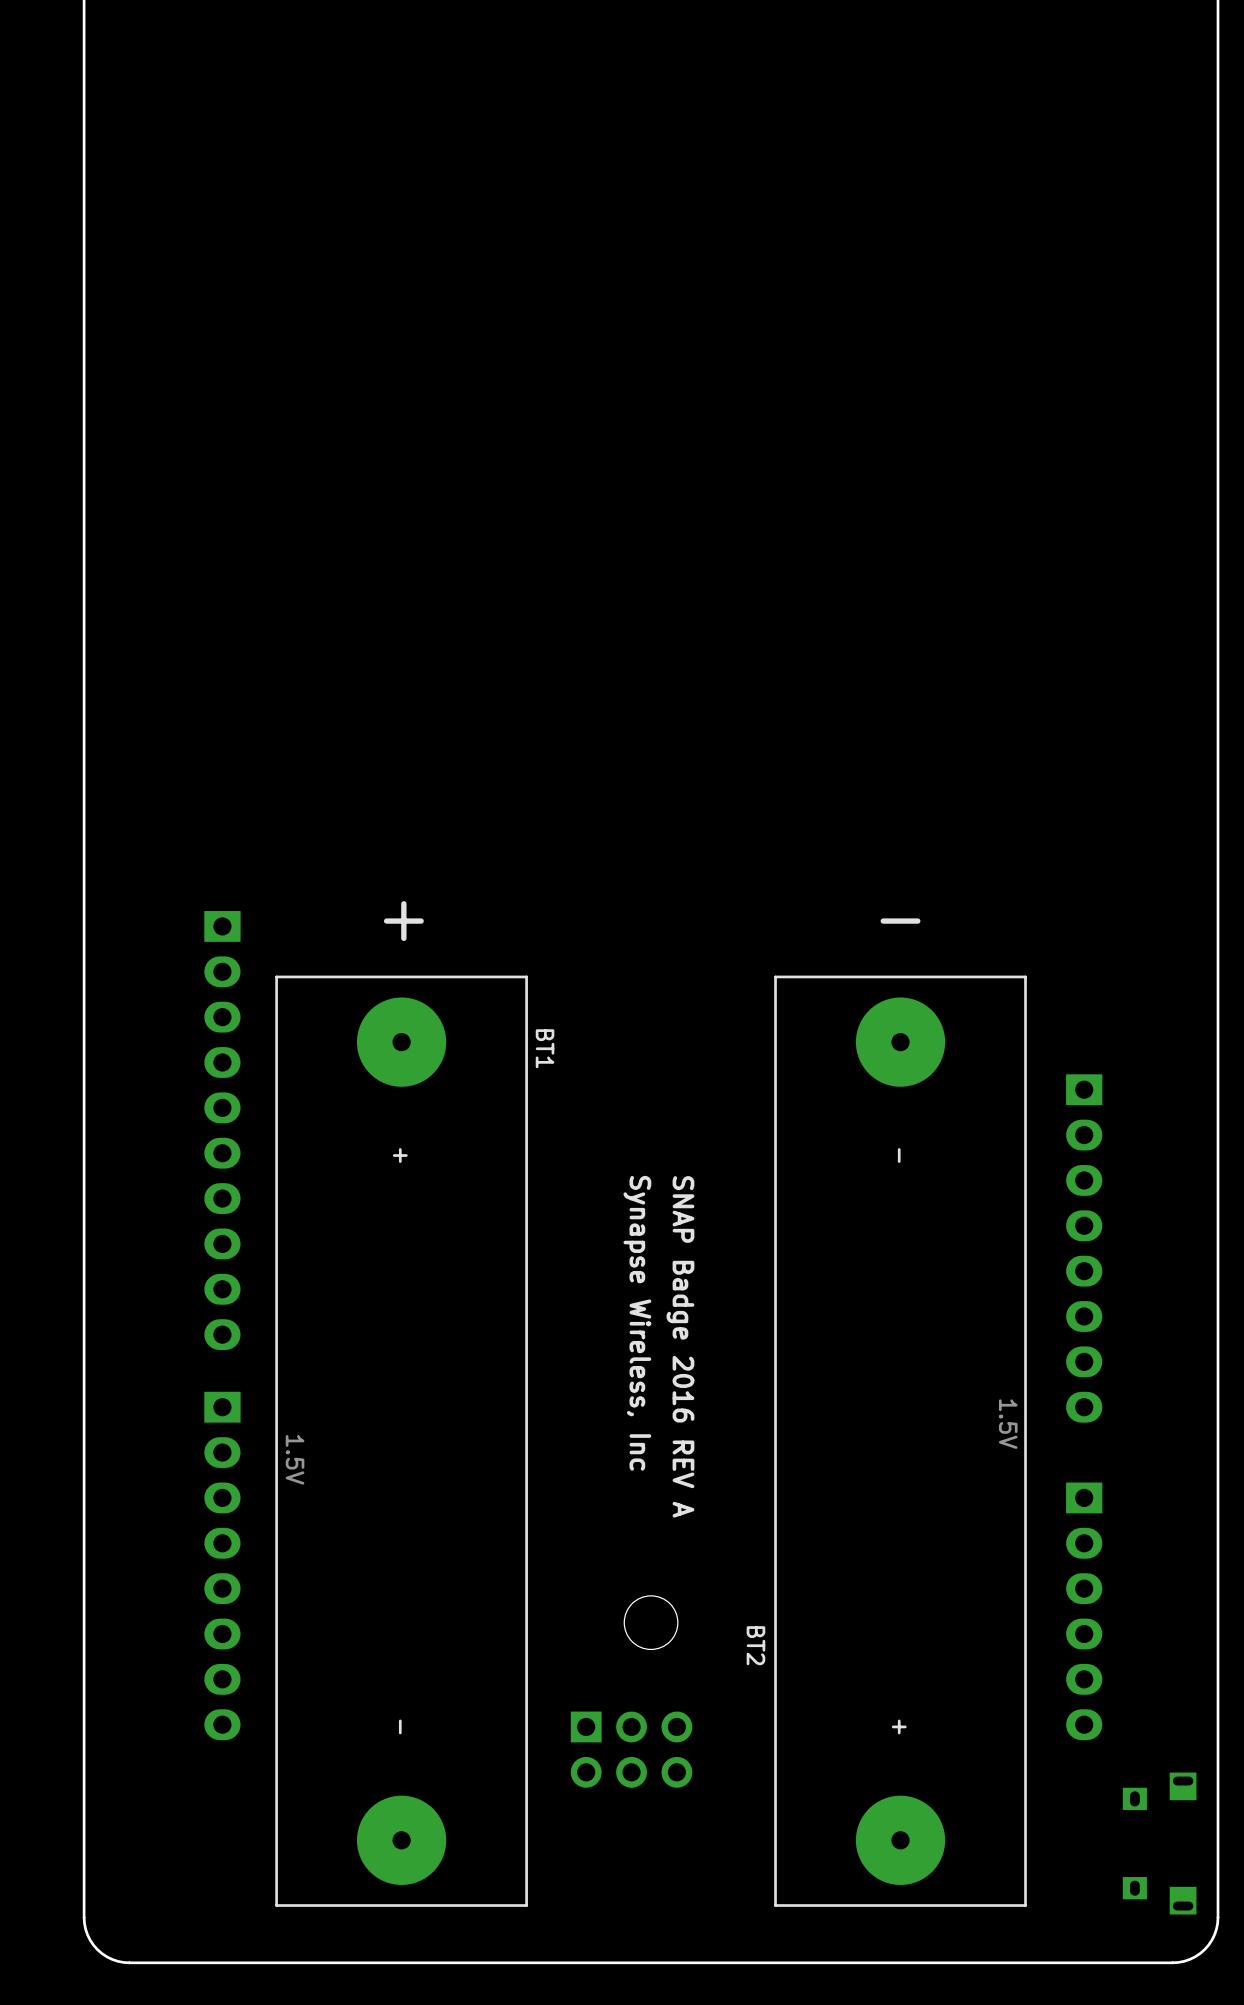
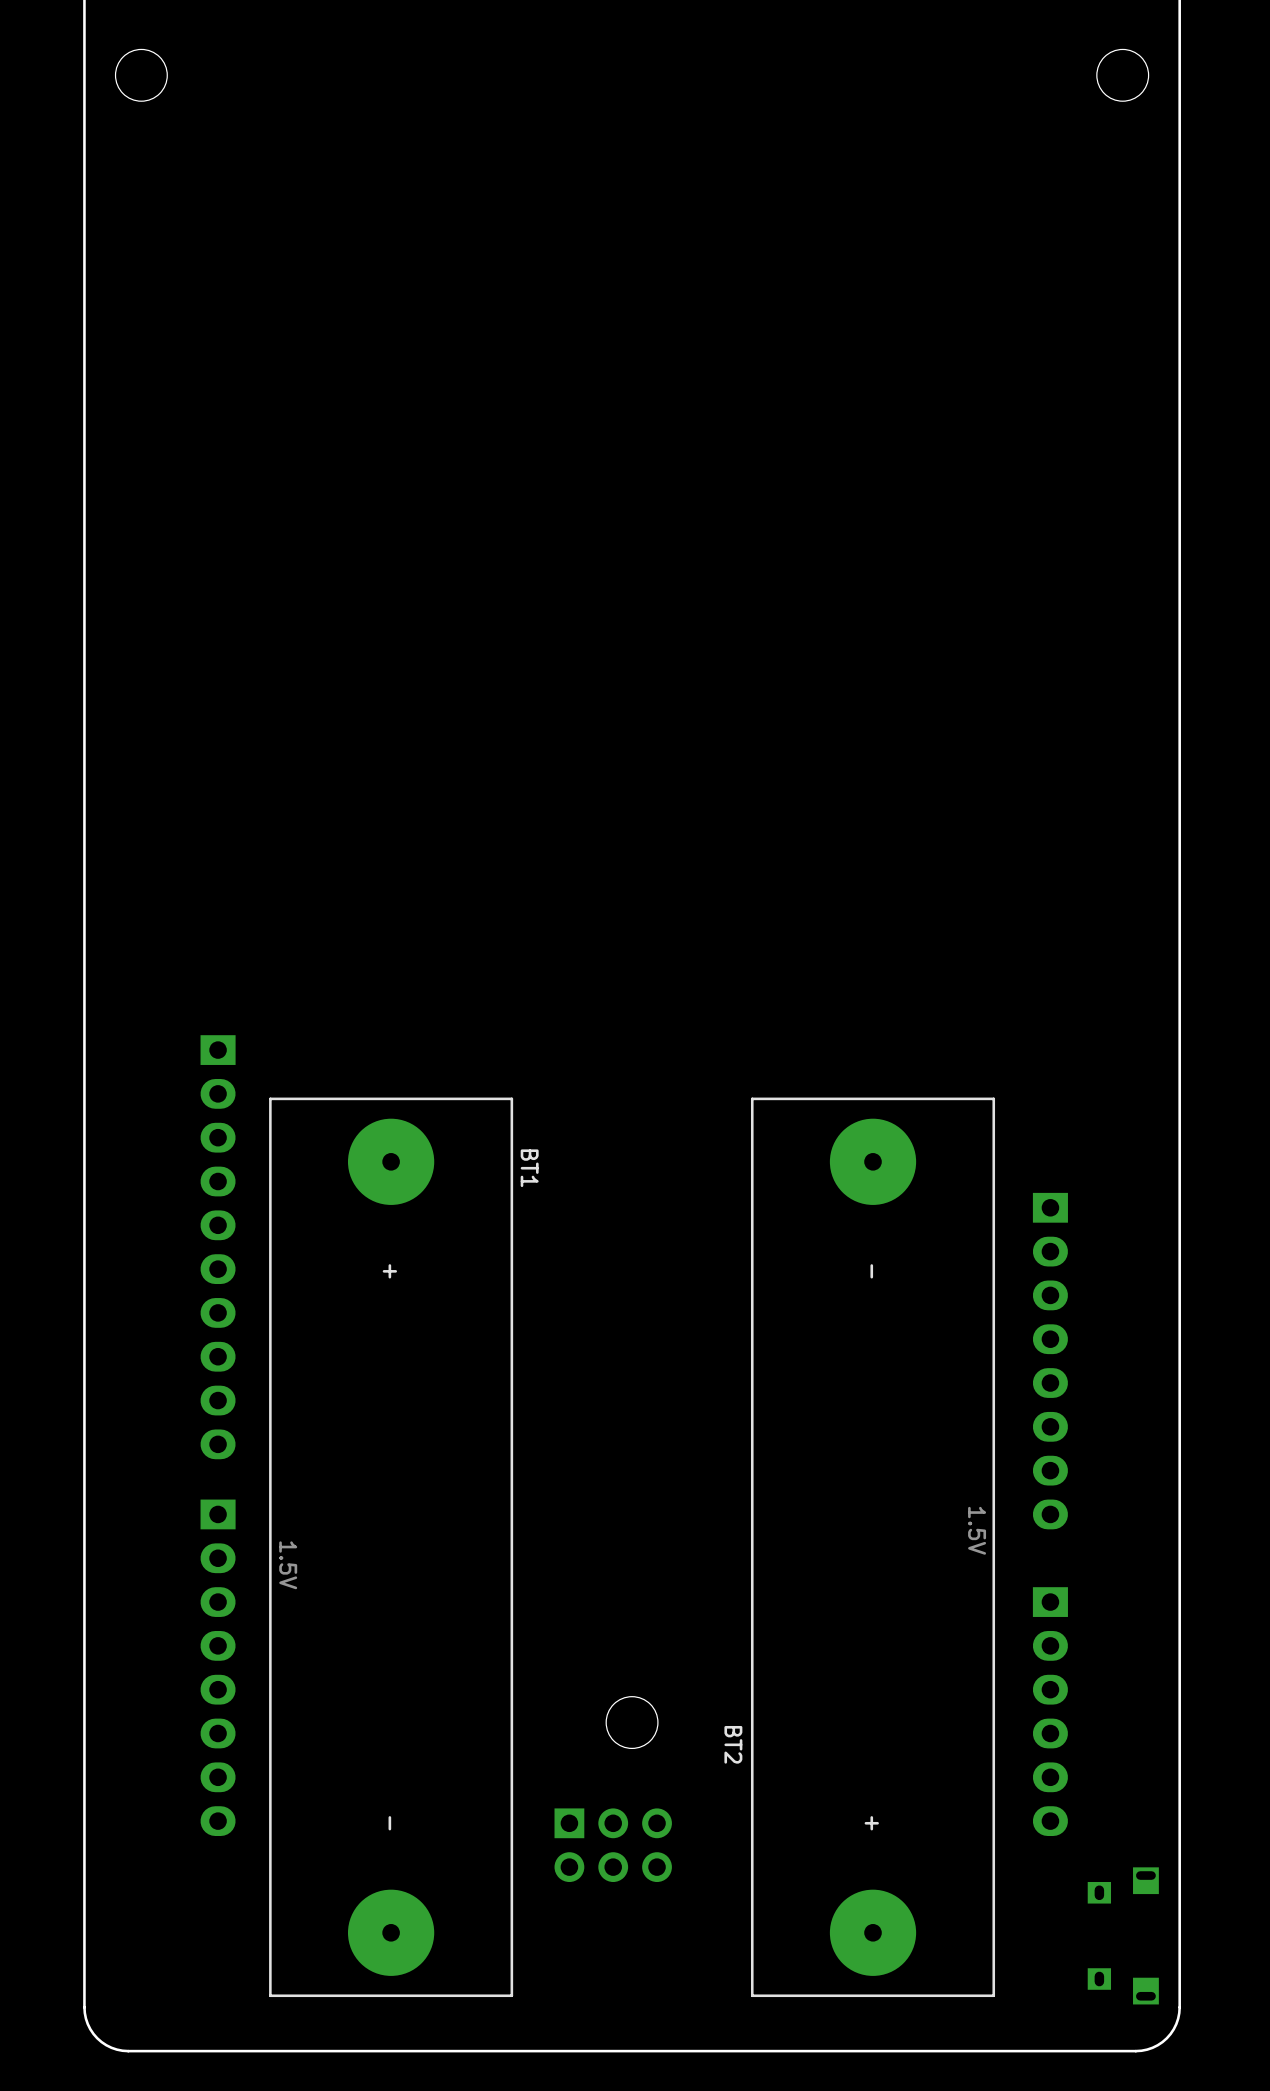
text: + (403, 921) -> none
text: - (900, 921) -> none
text: Synapse Wireless, Inc (637, 1323) -> none
text: SNAP Badge 2016 REV A (680, 1346) -> none

